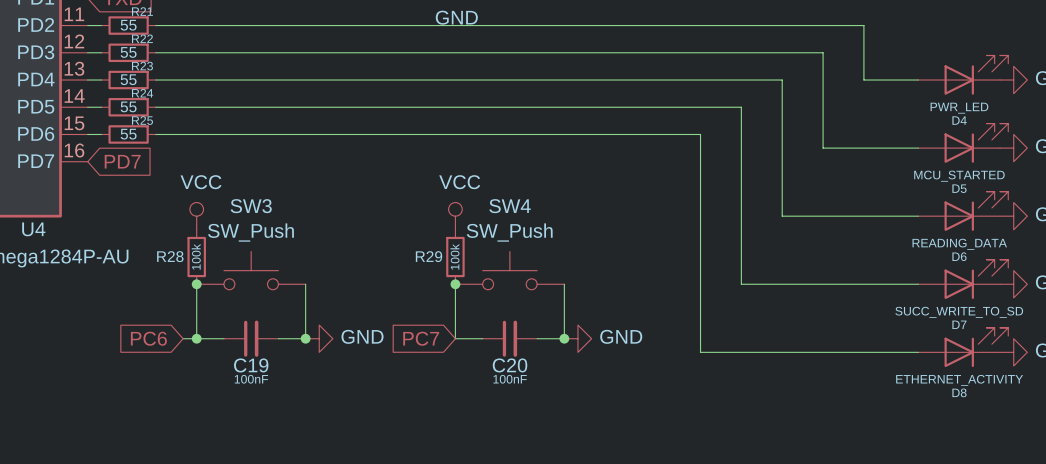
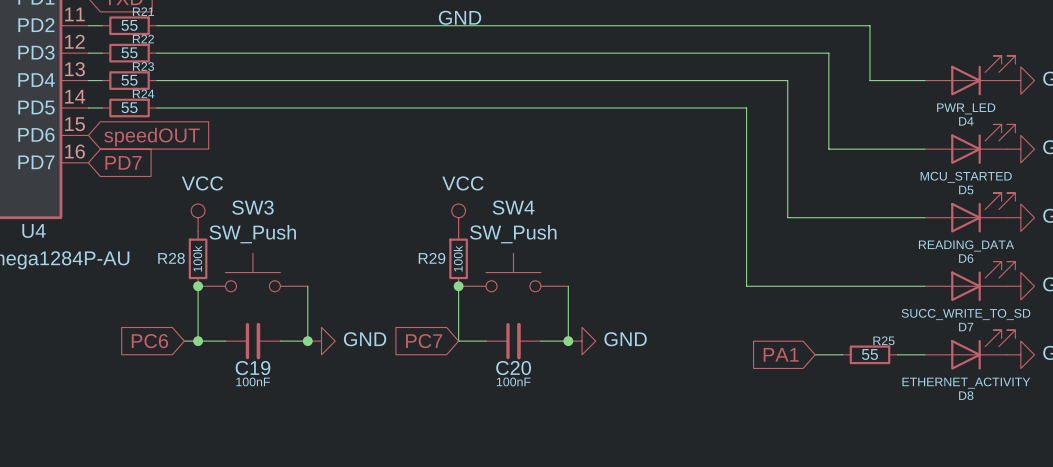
wire: (87, 134) (101, 134) -> none
R25 position: (128, 134) -> (869, 354)
wire: (155, 134) (700, 134) (700, 352) (809, 352) -> none
global label: none -> speedOUT (152, 137)
global label: none -> PA1 (781, 354)
wire: (836, 352) (891, 352) -> none

